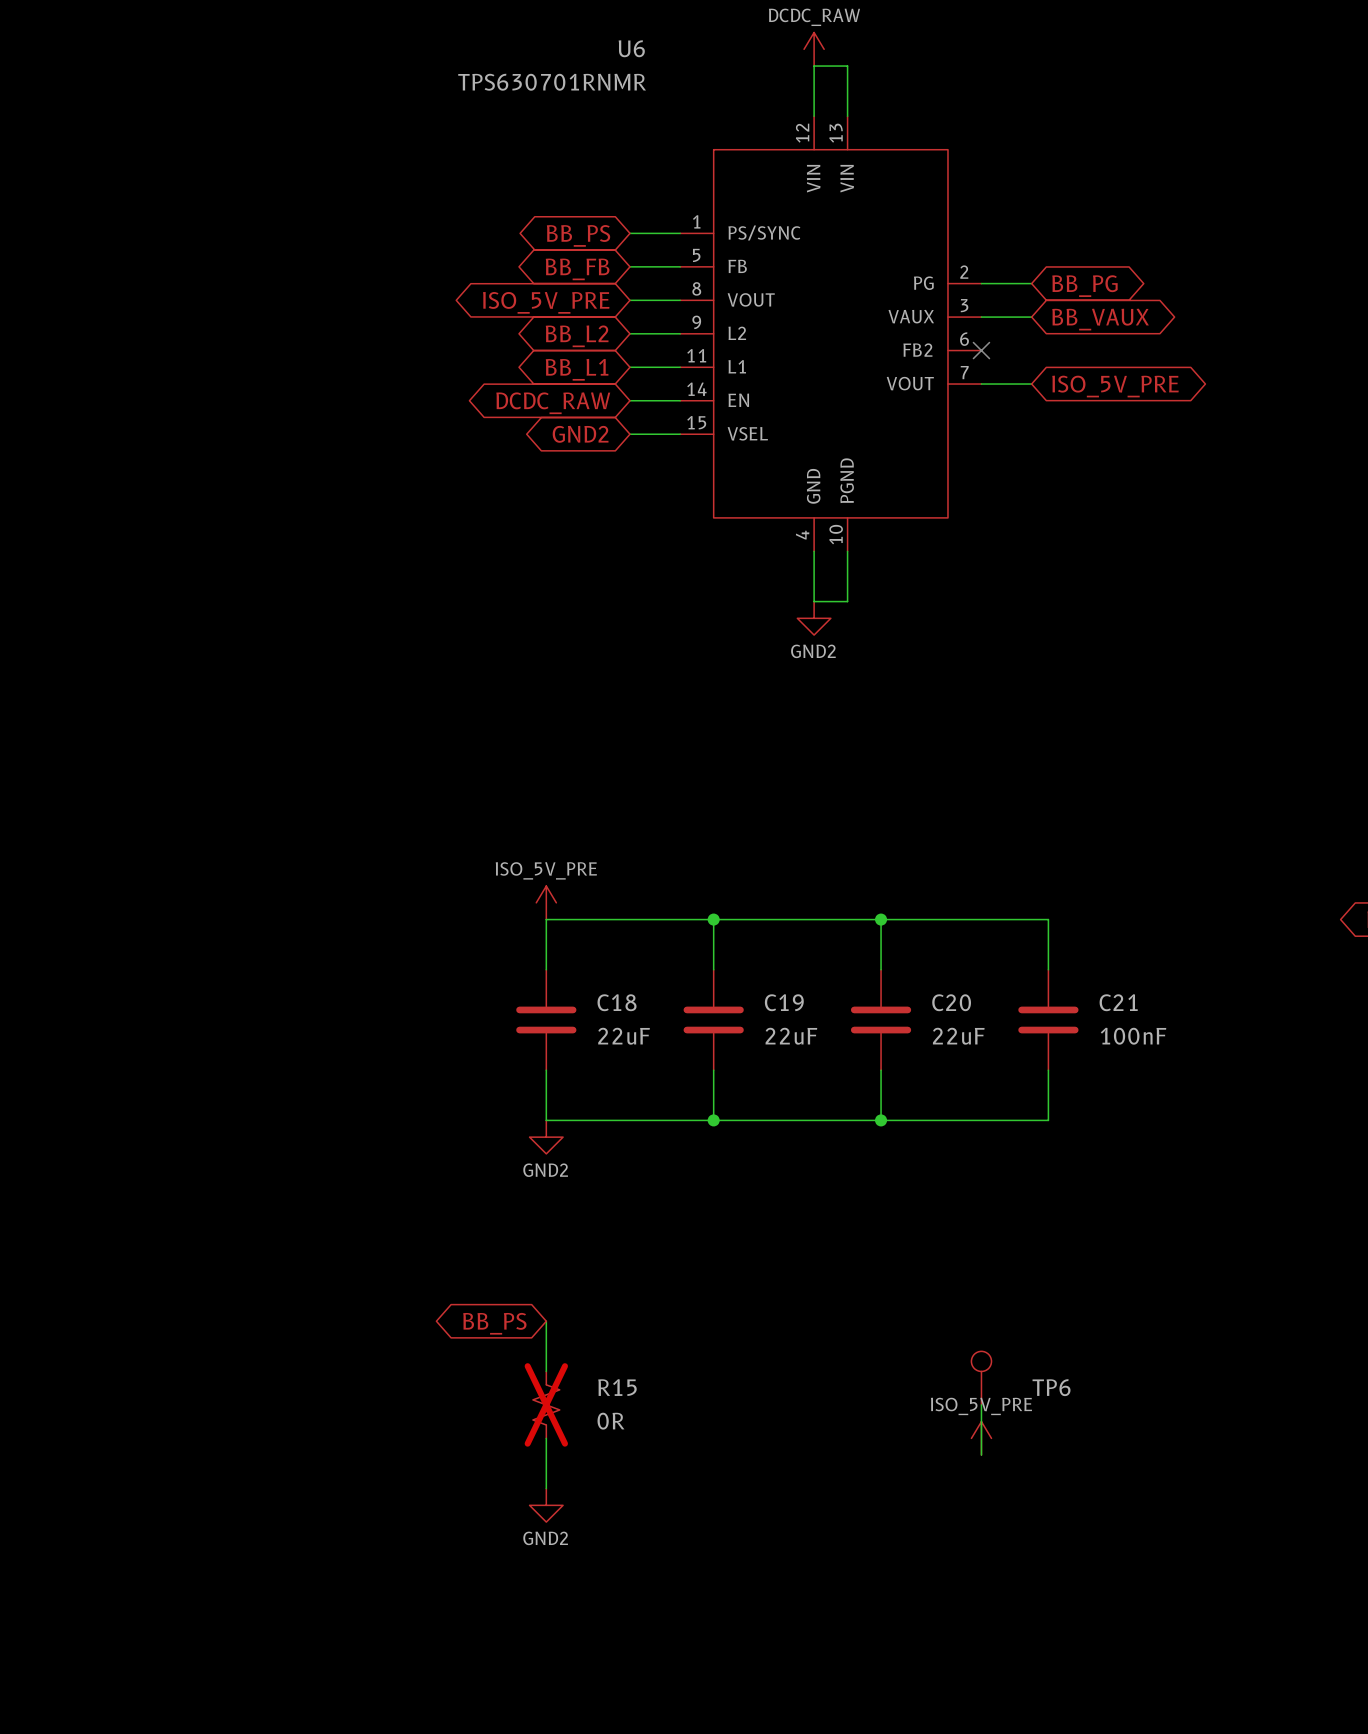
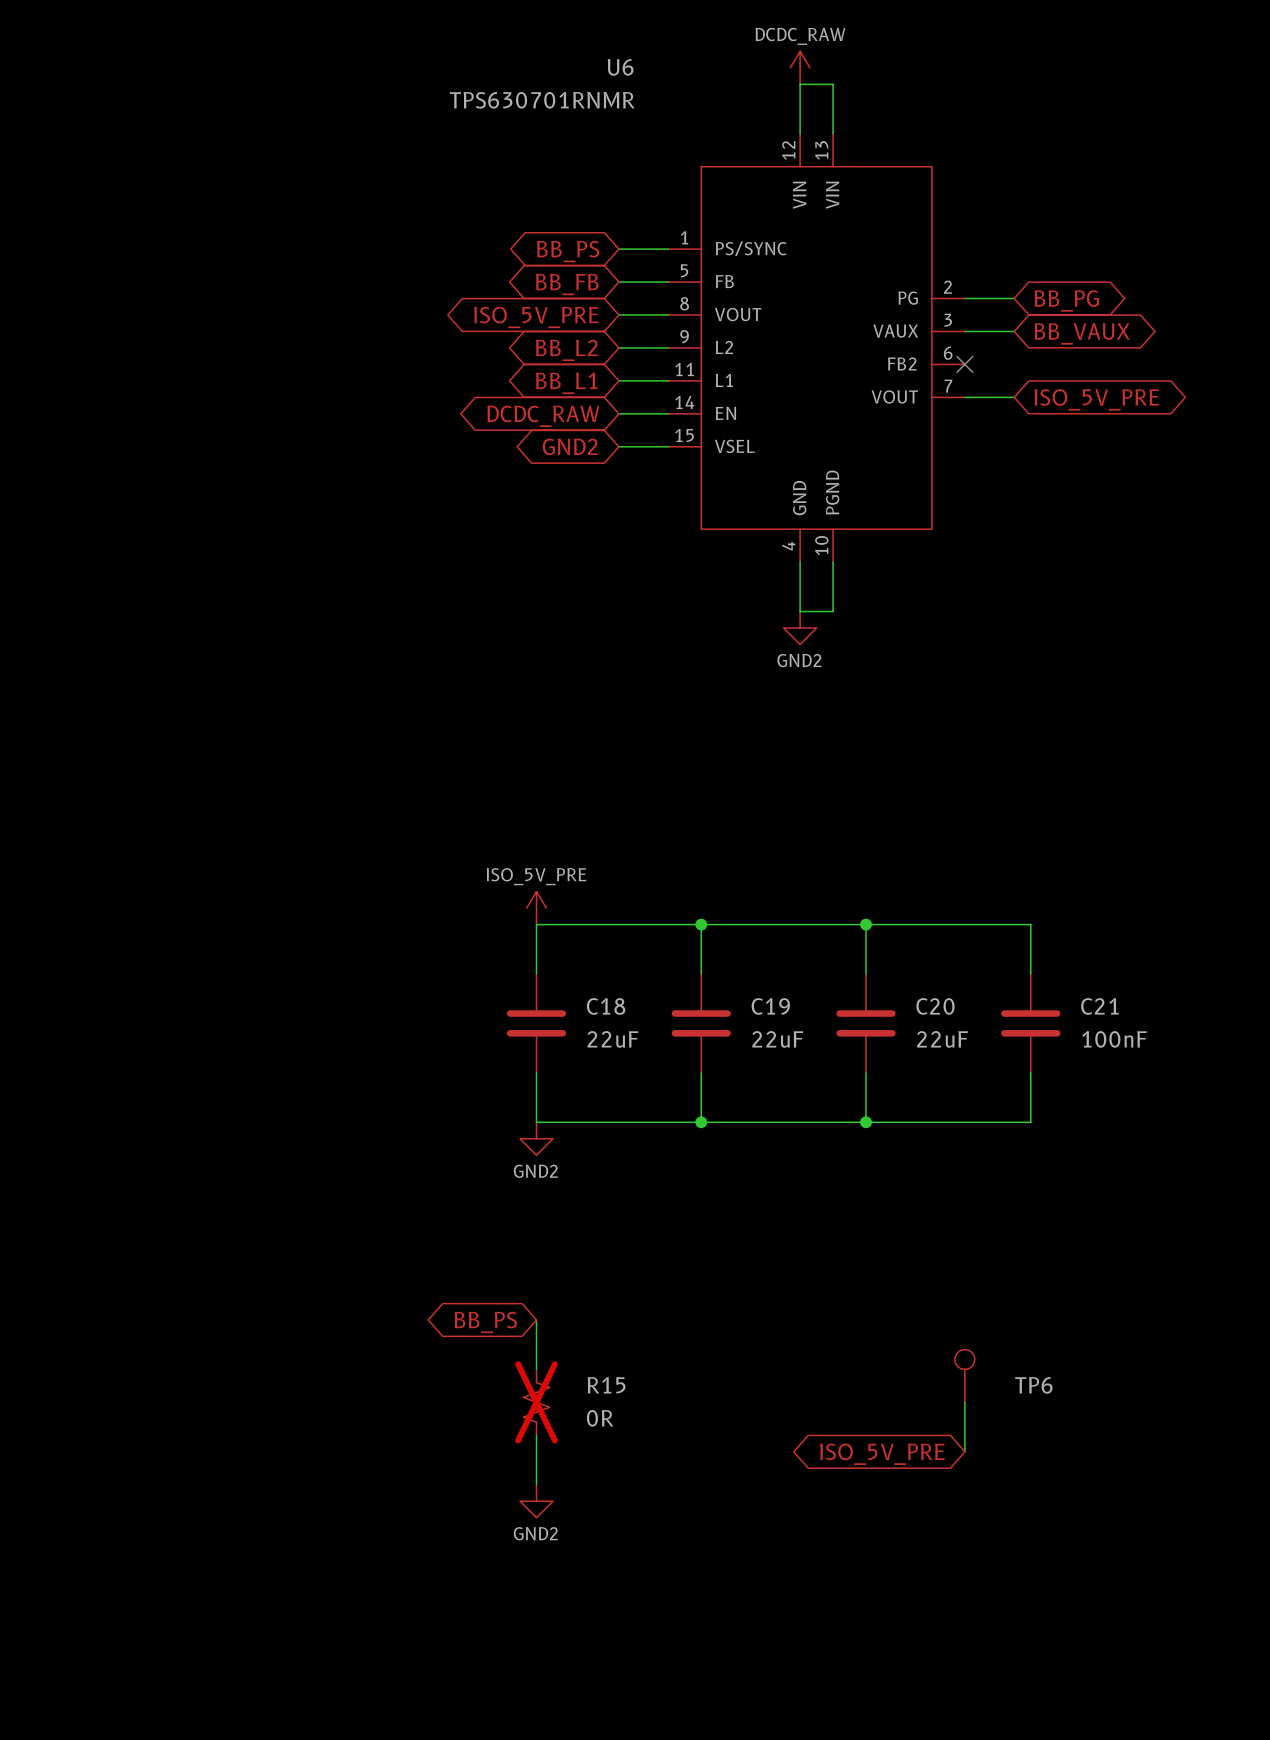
power symbol: ISO_5V_PRE (981, 1438) -> none
global label: none -> ISO_5V_PRE (882, 1454)

